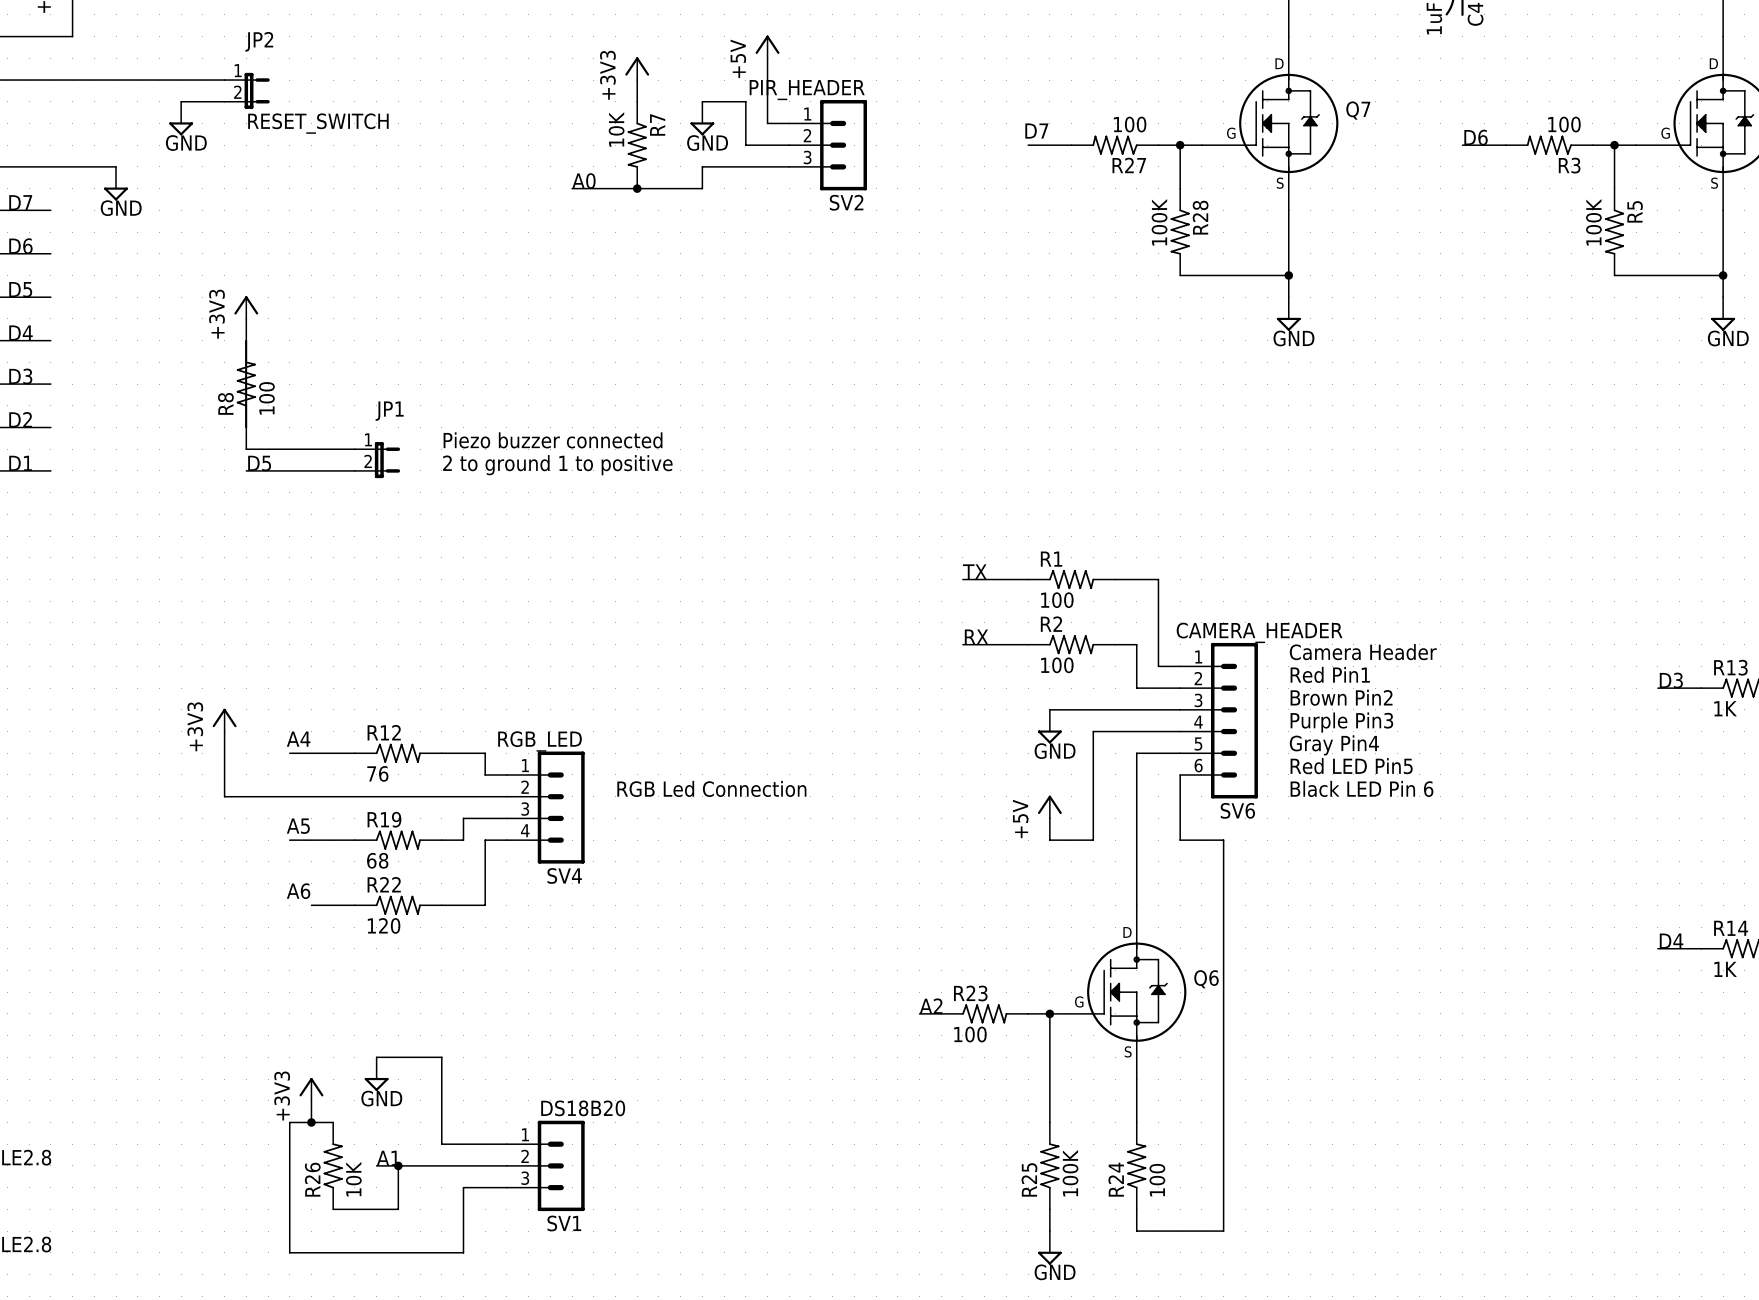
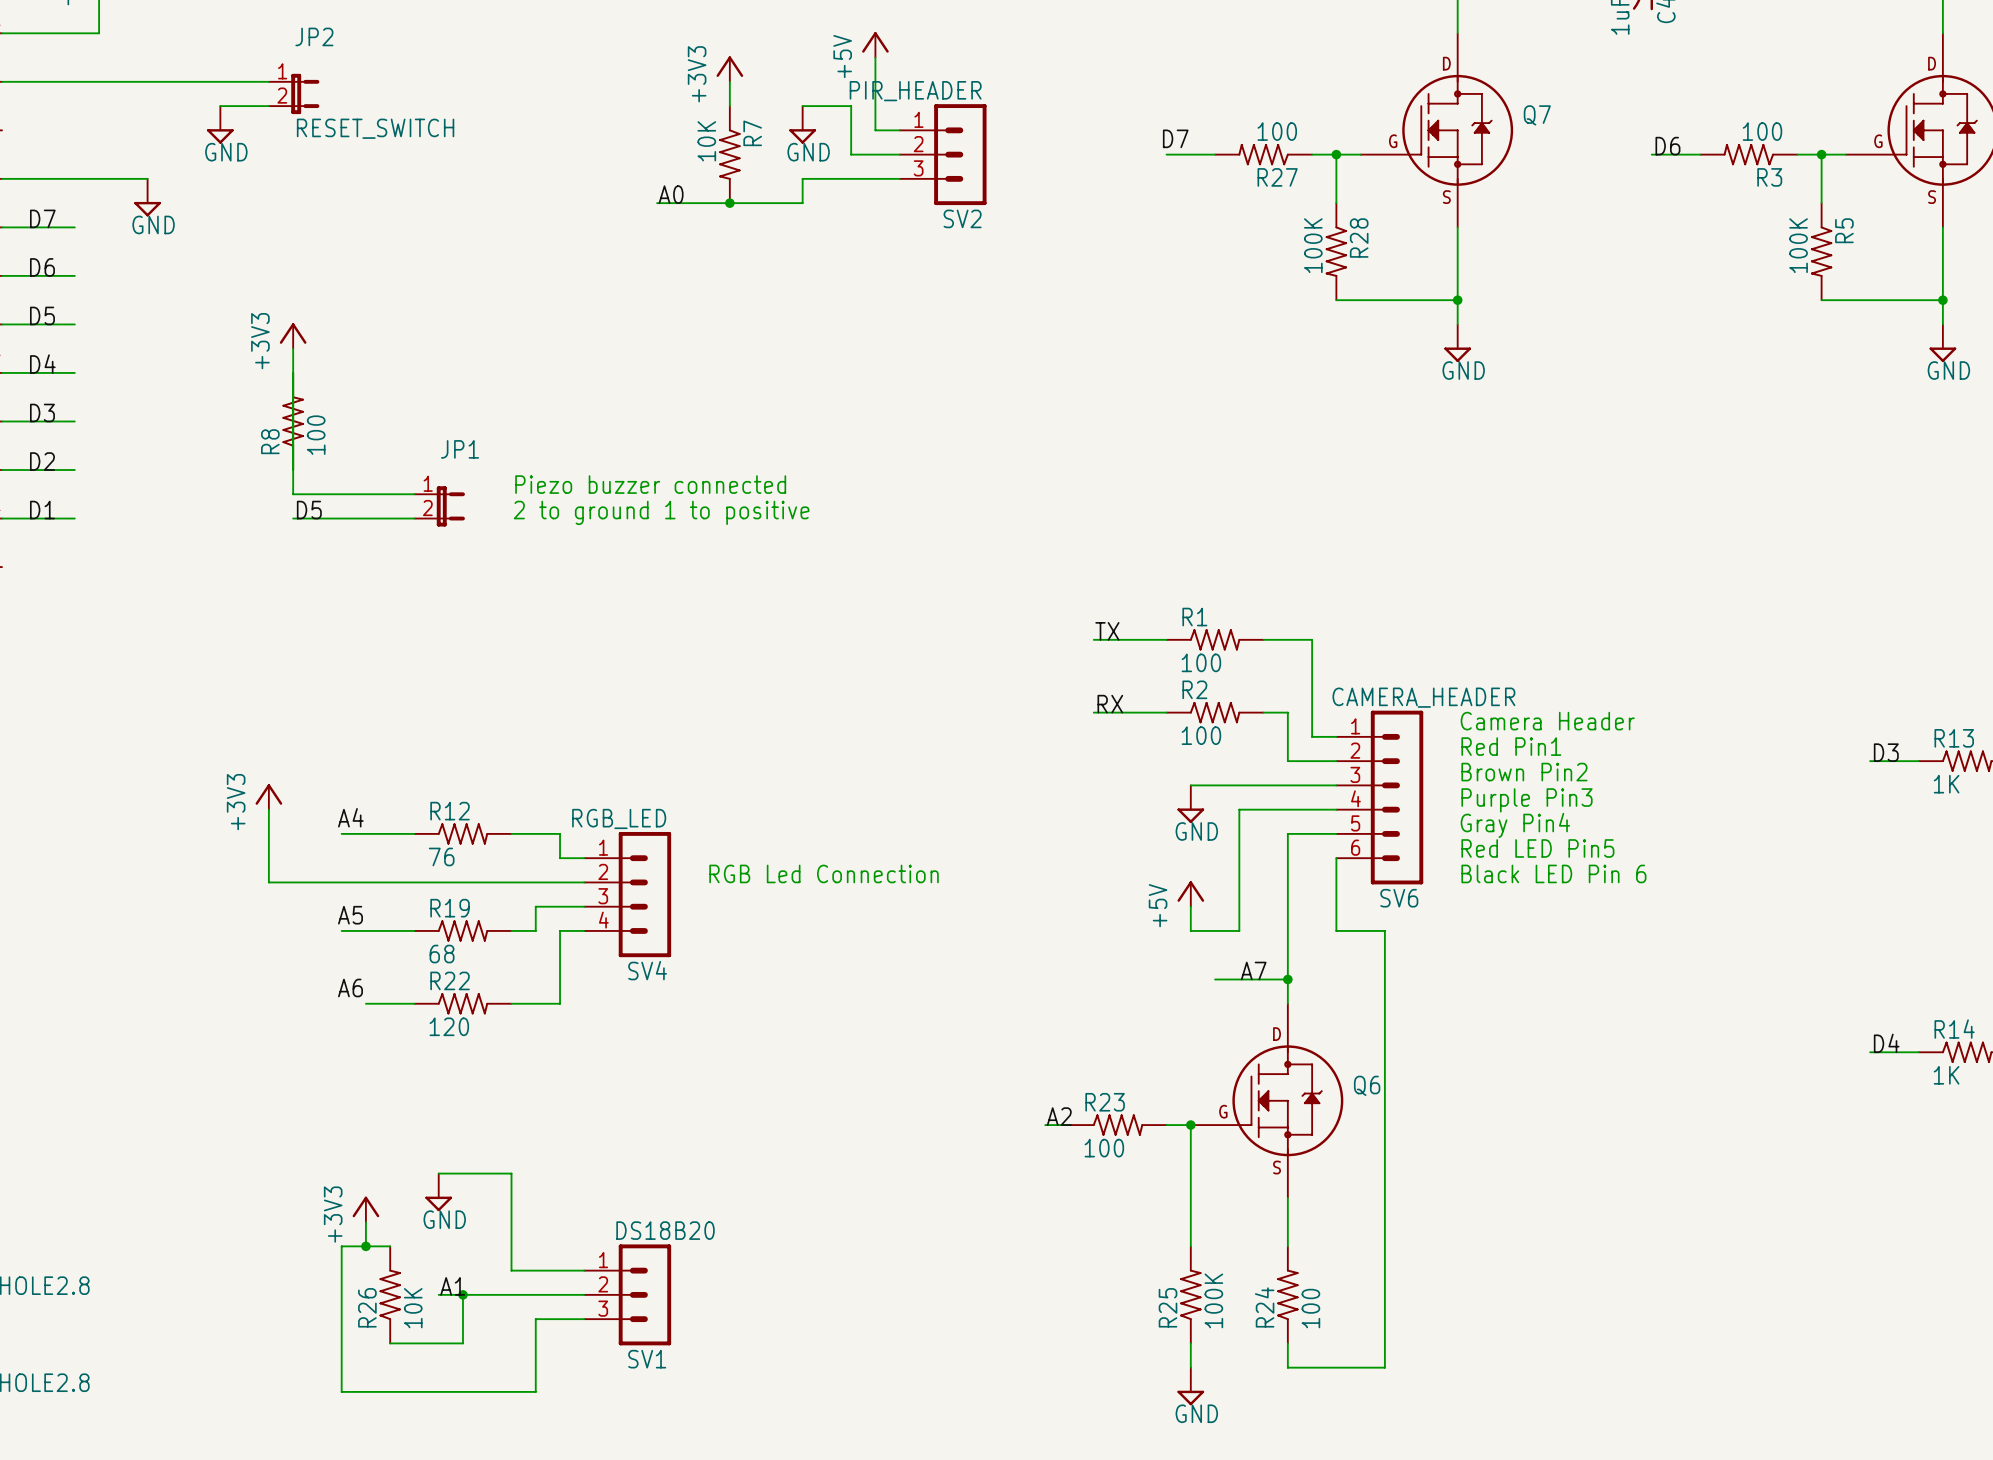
label: none -> A7 (1253, 971)
wire: none -> (1215, 979) (1287, 979)
junction: none -> (1287, 979)

